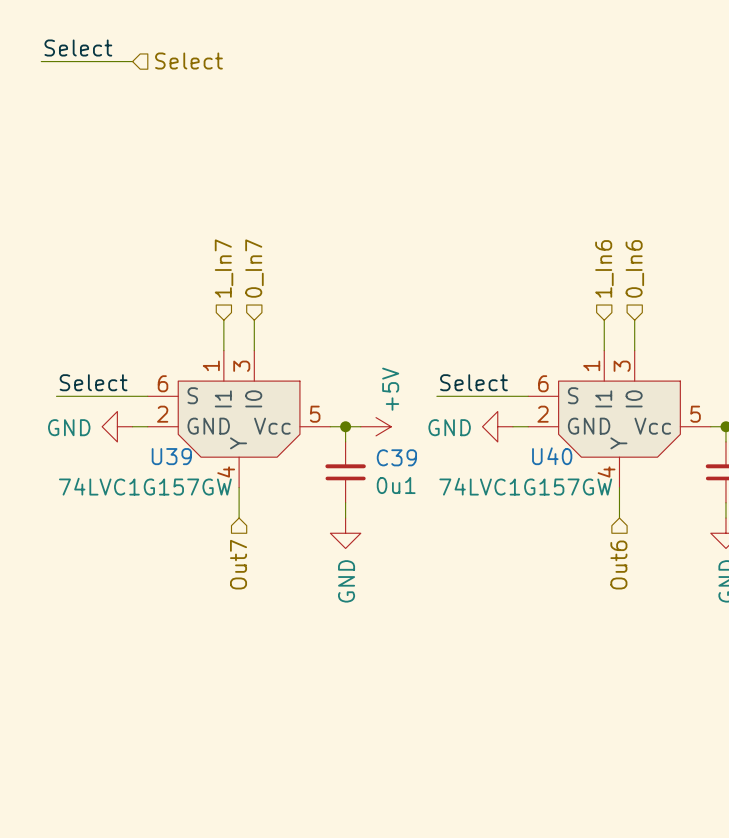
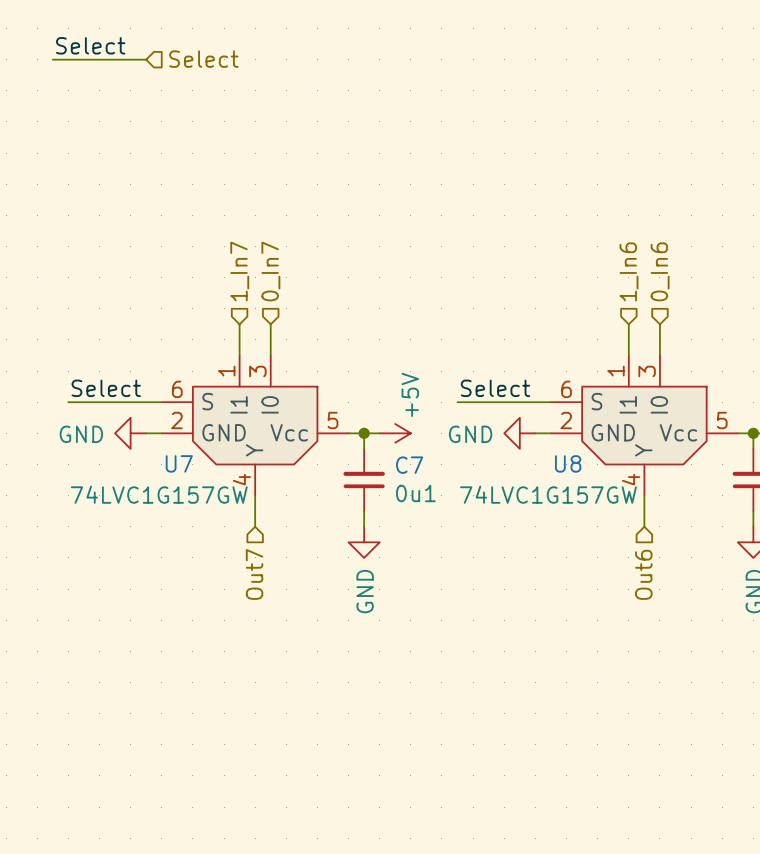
U39 name: U39 (171, 456) -> U7 (179, 463)
U40 name: U40 (552, 456) -> U8 (568, 463)
C39 name: C39 (396, 457) -> C7 (409, 465)

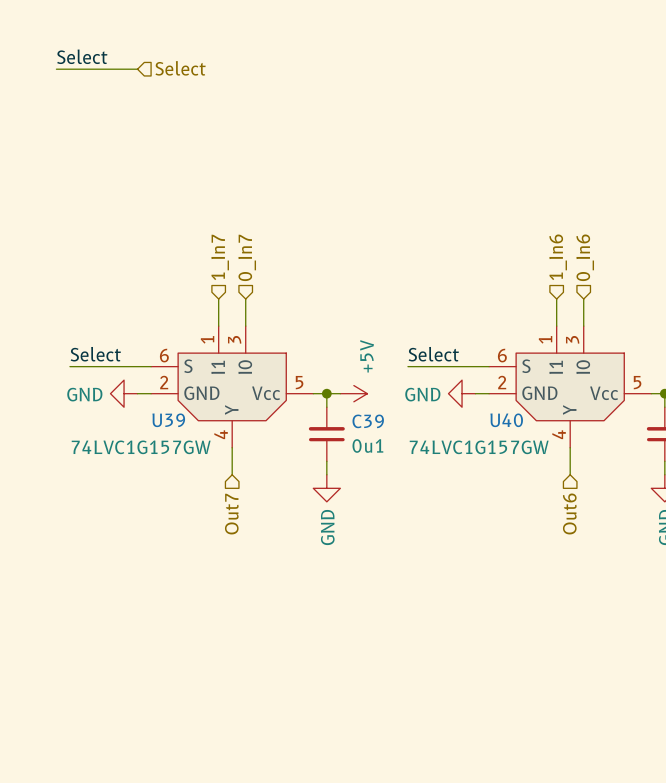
U7 name: U7 (179, 463) -> U39 (168, 420)
U8 name: U8 (568, 463) -> U40 (506, 420)
C7 name: C7 (409, 465) -> C39 (368, 421)

